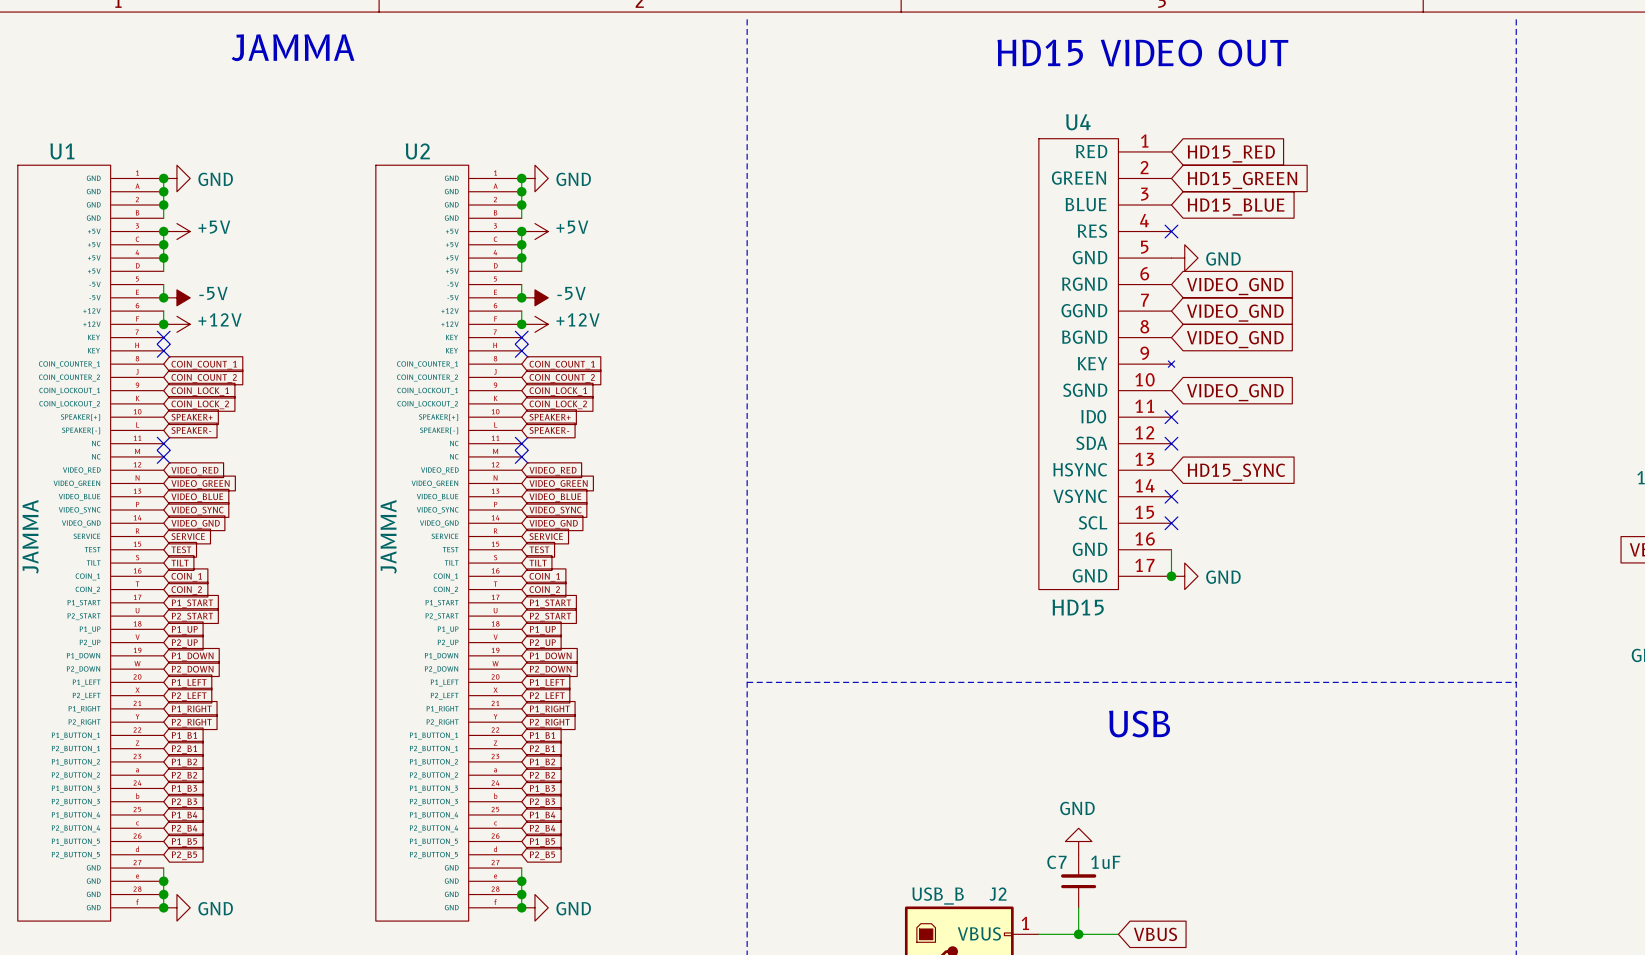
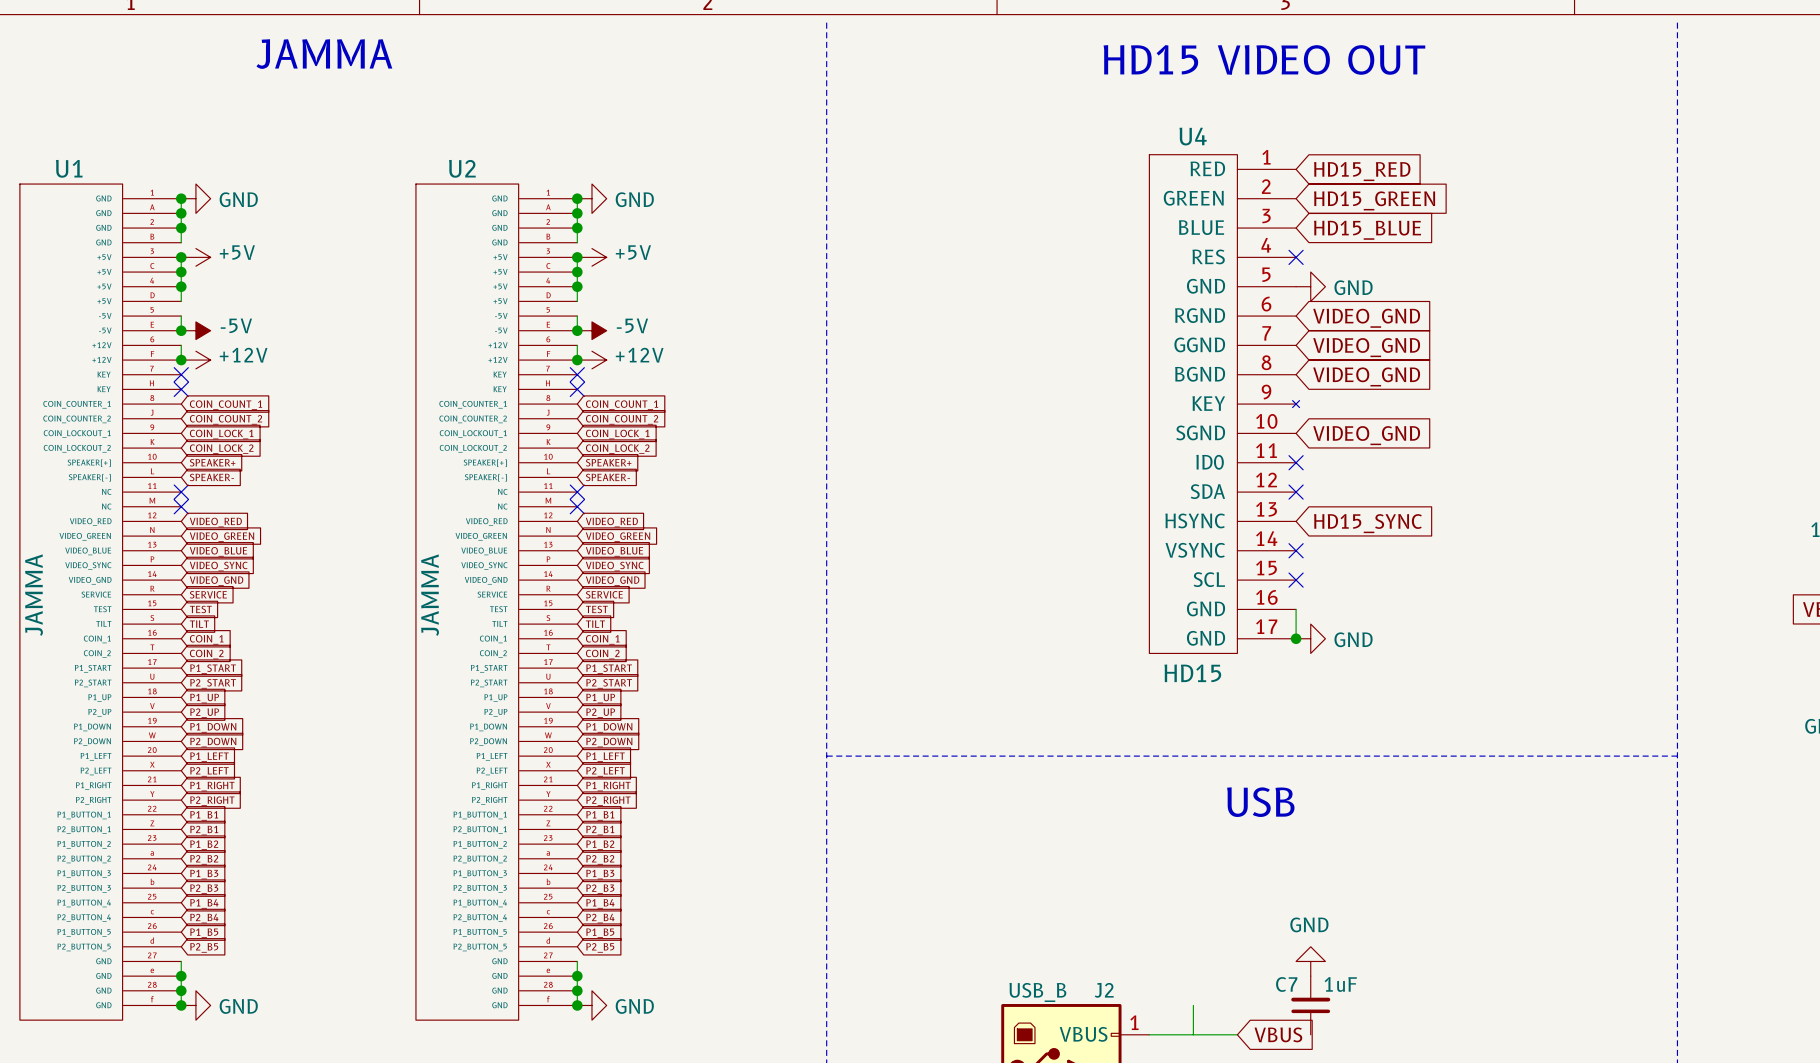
power symbol position: GND (1078, 841) -> GND (1310, 961)
C7 position: (1078, 881) -> (1310, 1005)
junction: (1078, 934) -> none

